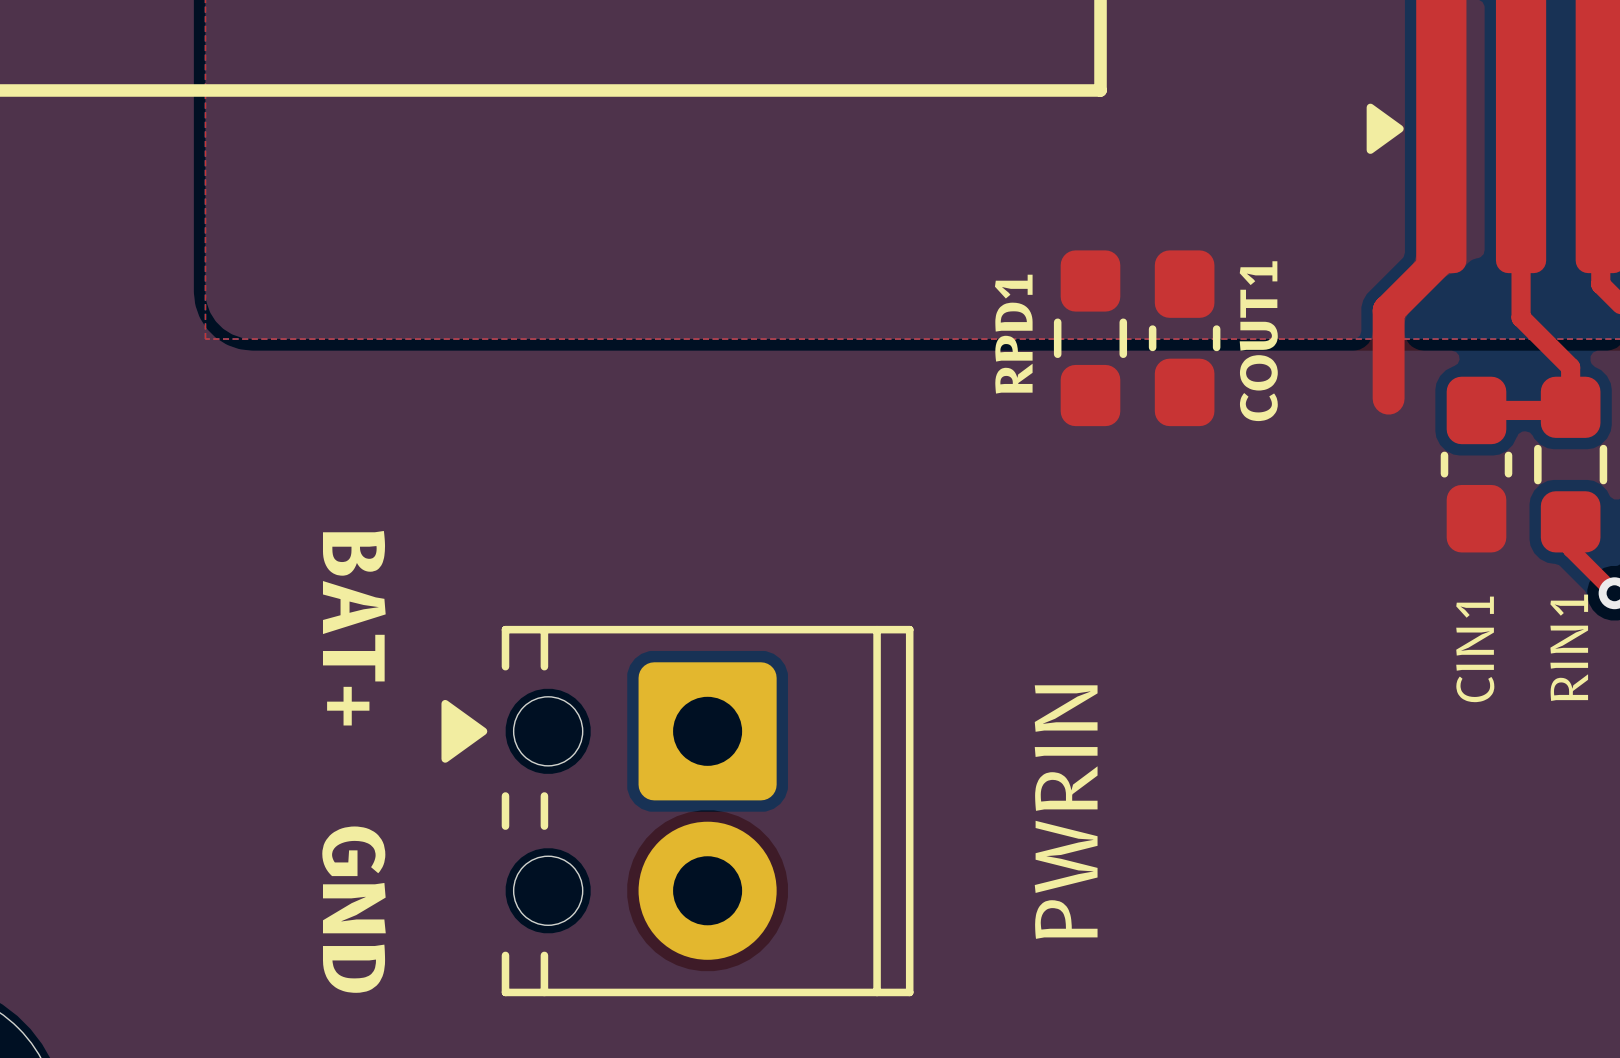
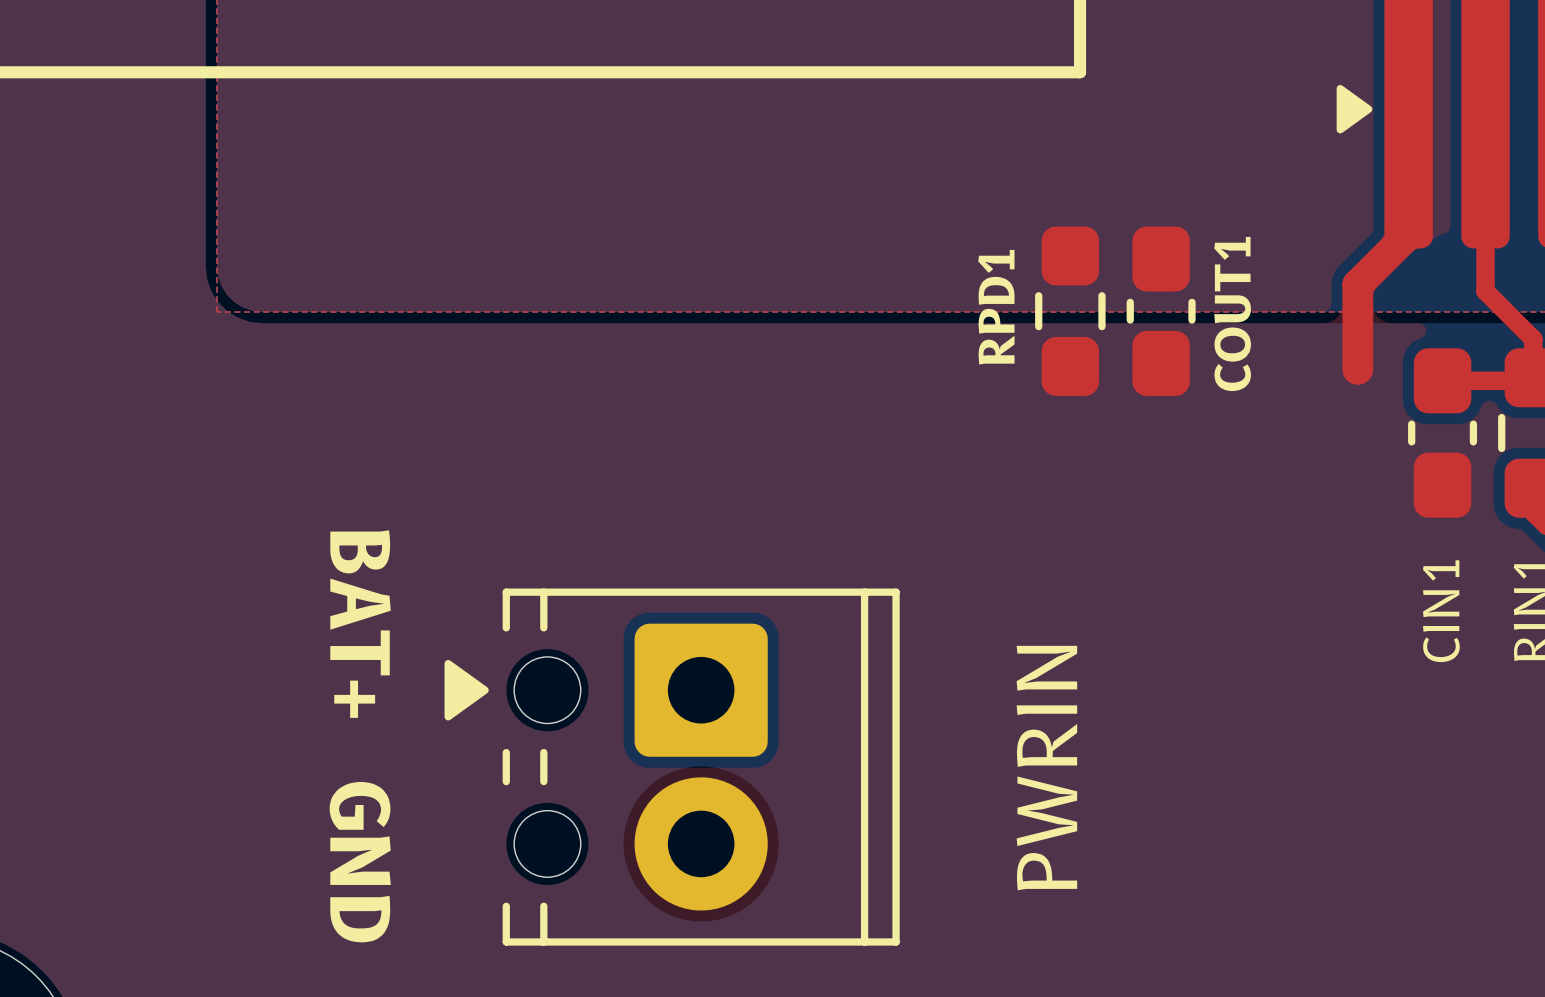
text position: BAT+ (354, 628) -> BAT+ (360, 624)

